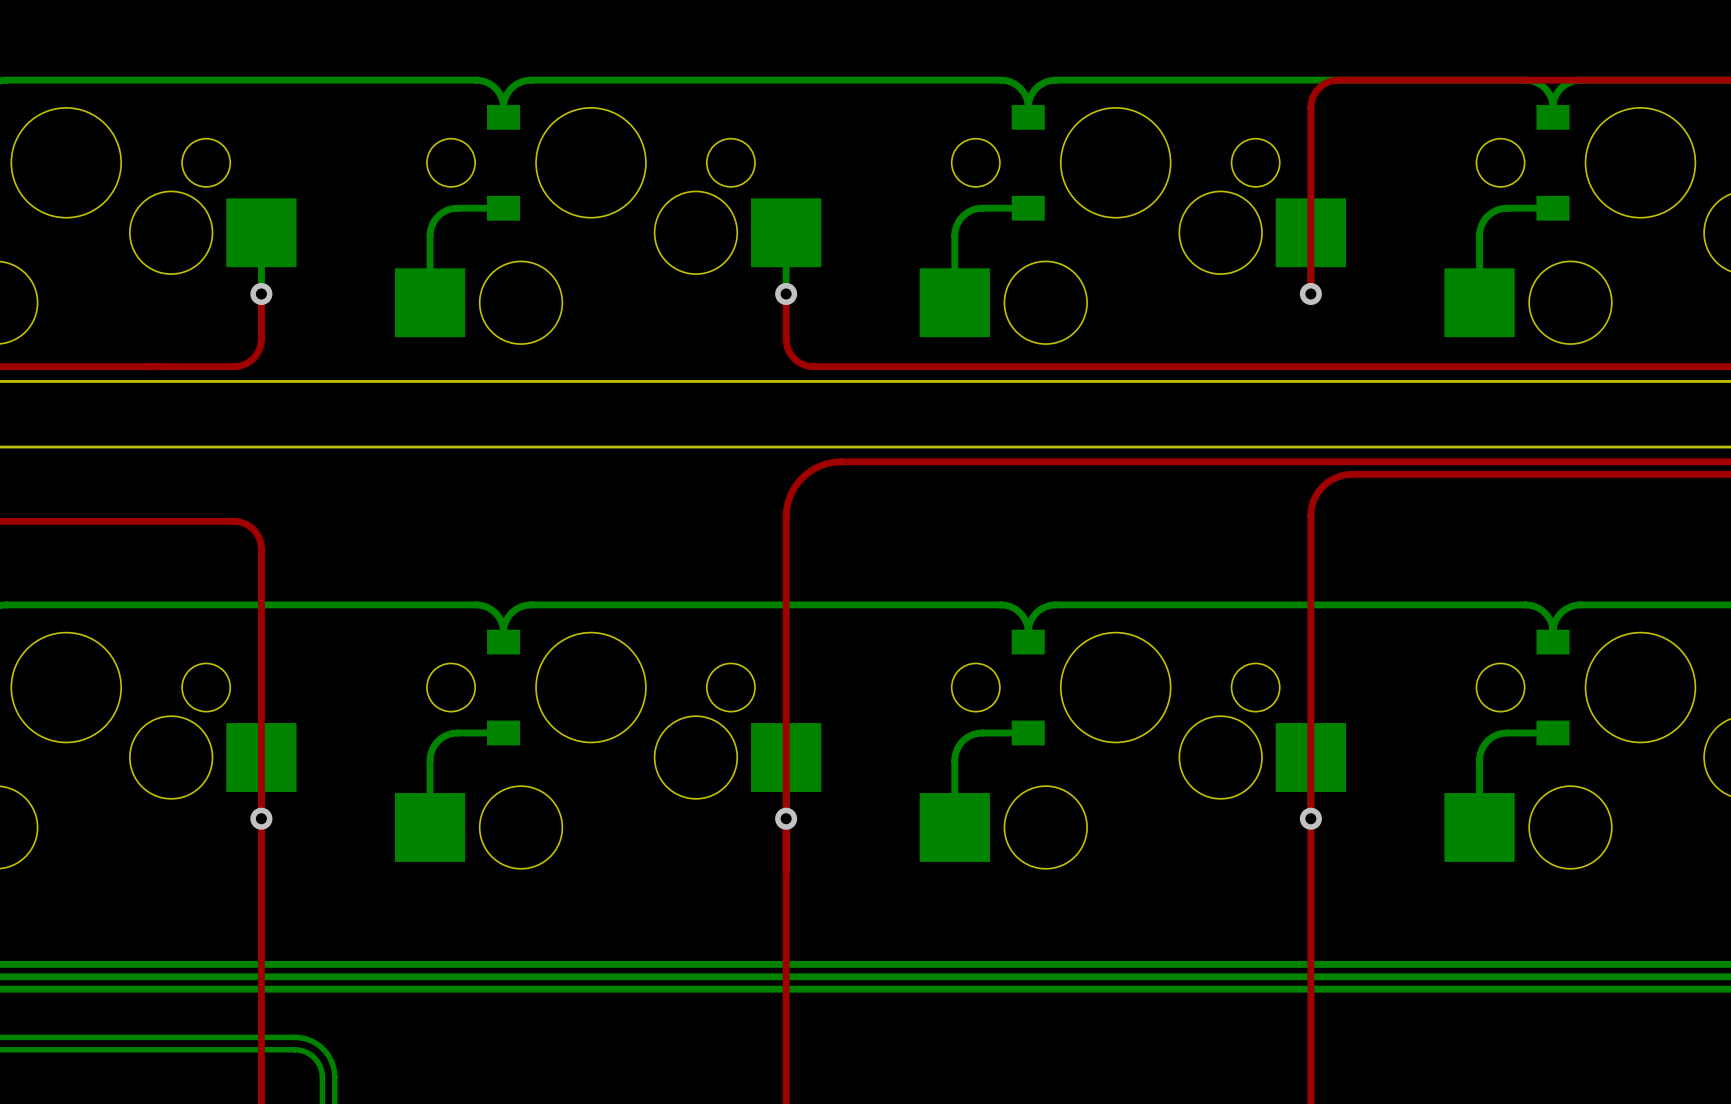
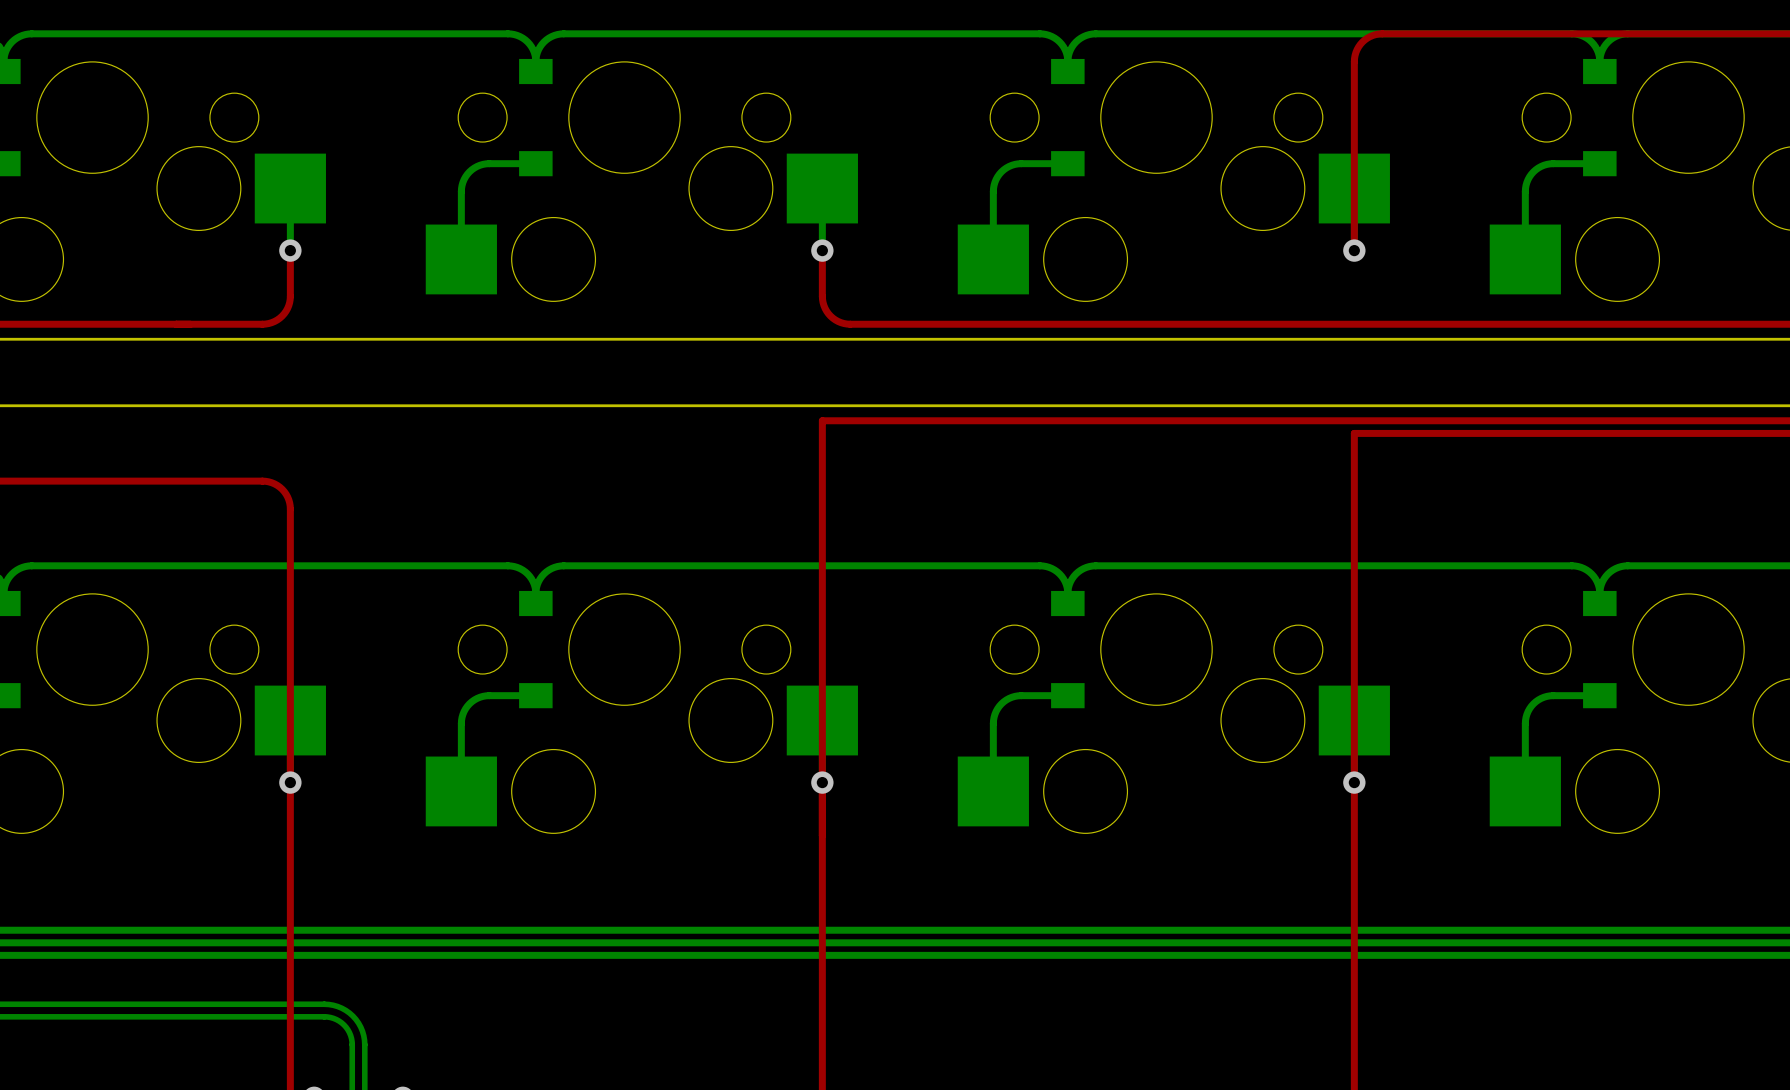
top track: (841, 461) (817, 467) (802, 477) (789, 498) (786, 516) -> (878, 420) (822, 420) (822, 476)
top track: (1352, 474) (1336, 477) (1322, 486) (1314, 499) (1310, 515) -> (1396, 433) (1354, 433) (1354, 475)

